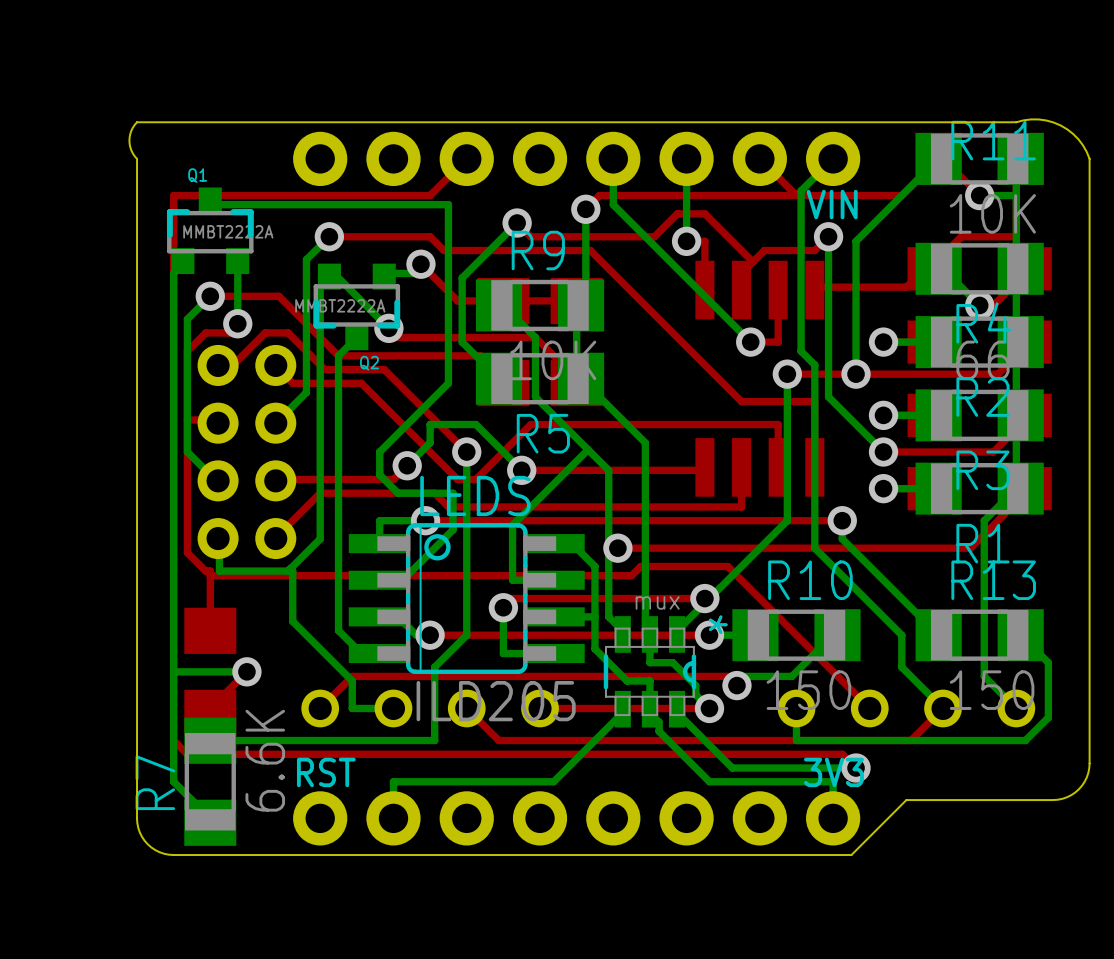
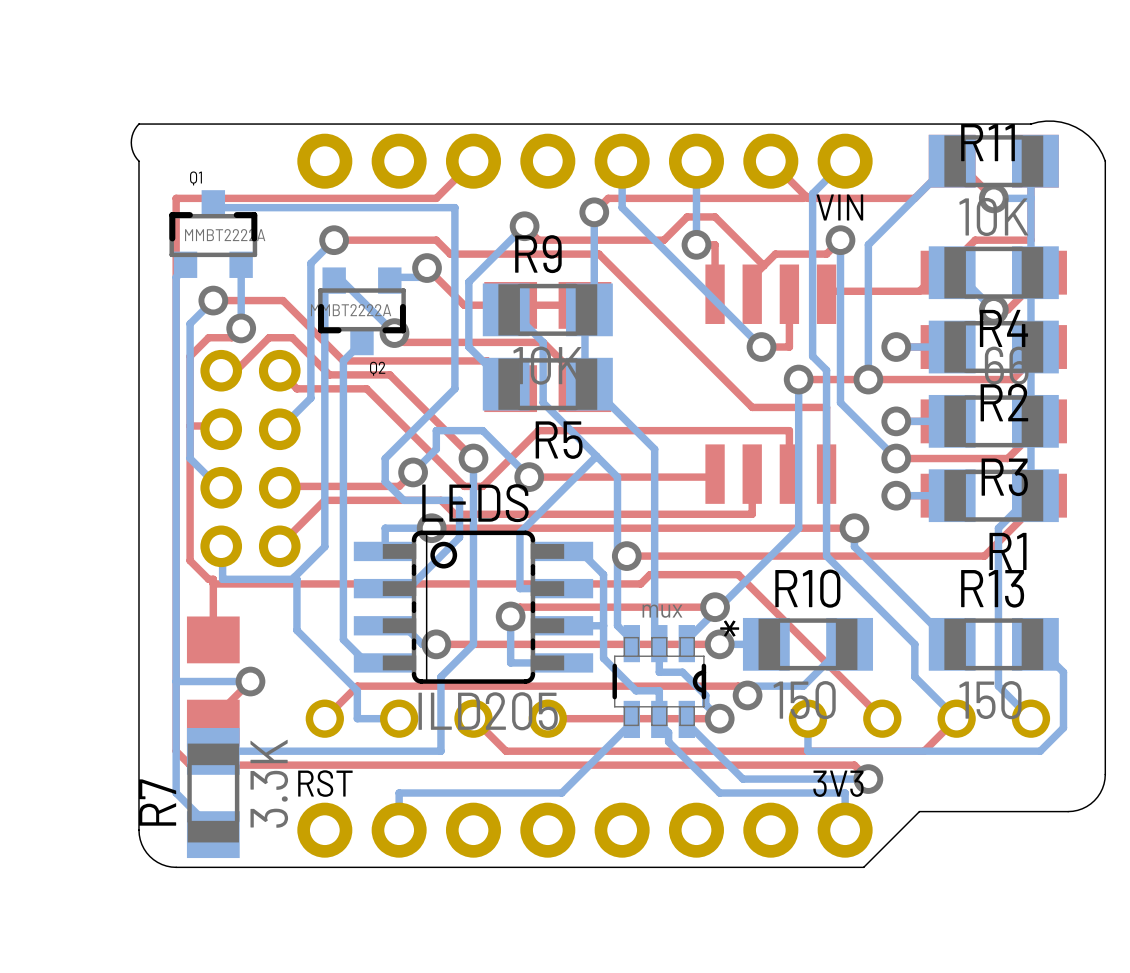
R7 value: 6.6K (265, 760) -> 3.3K (269, 783)

